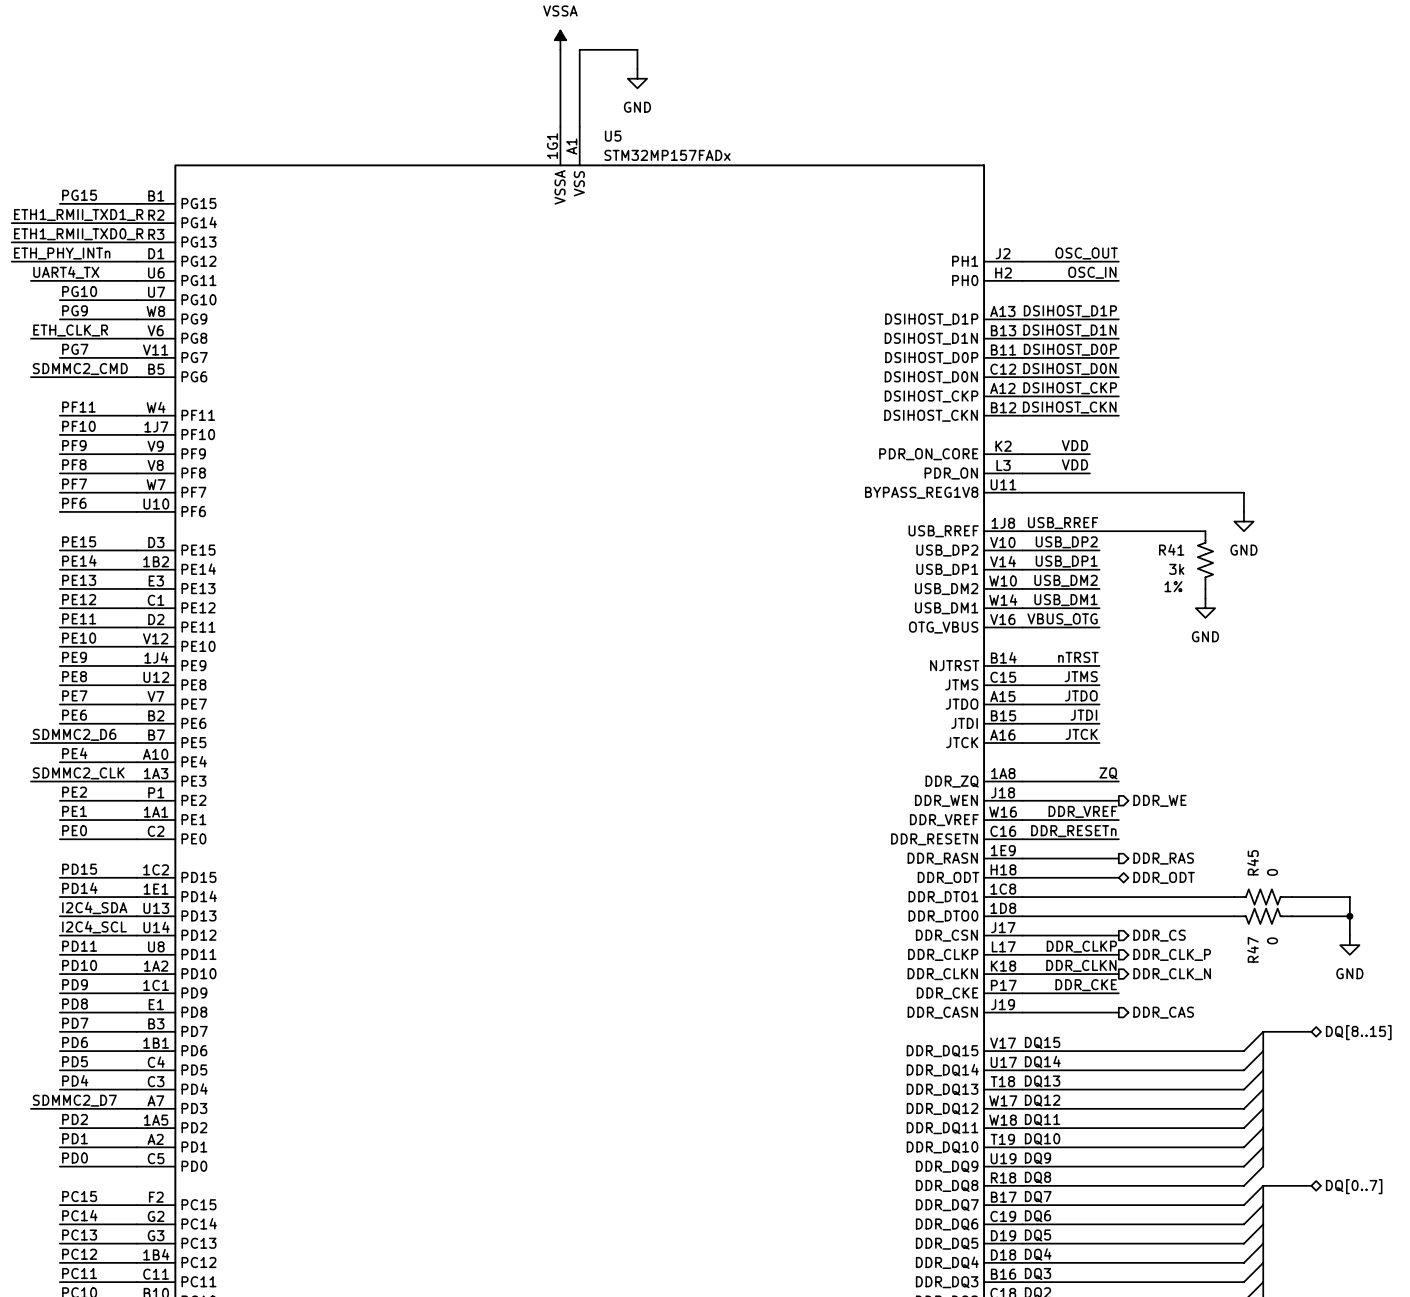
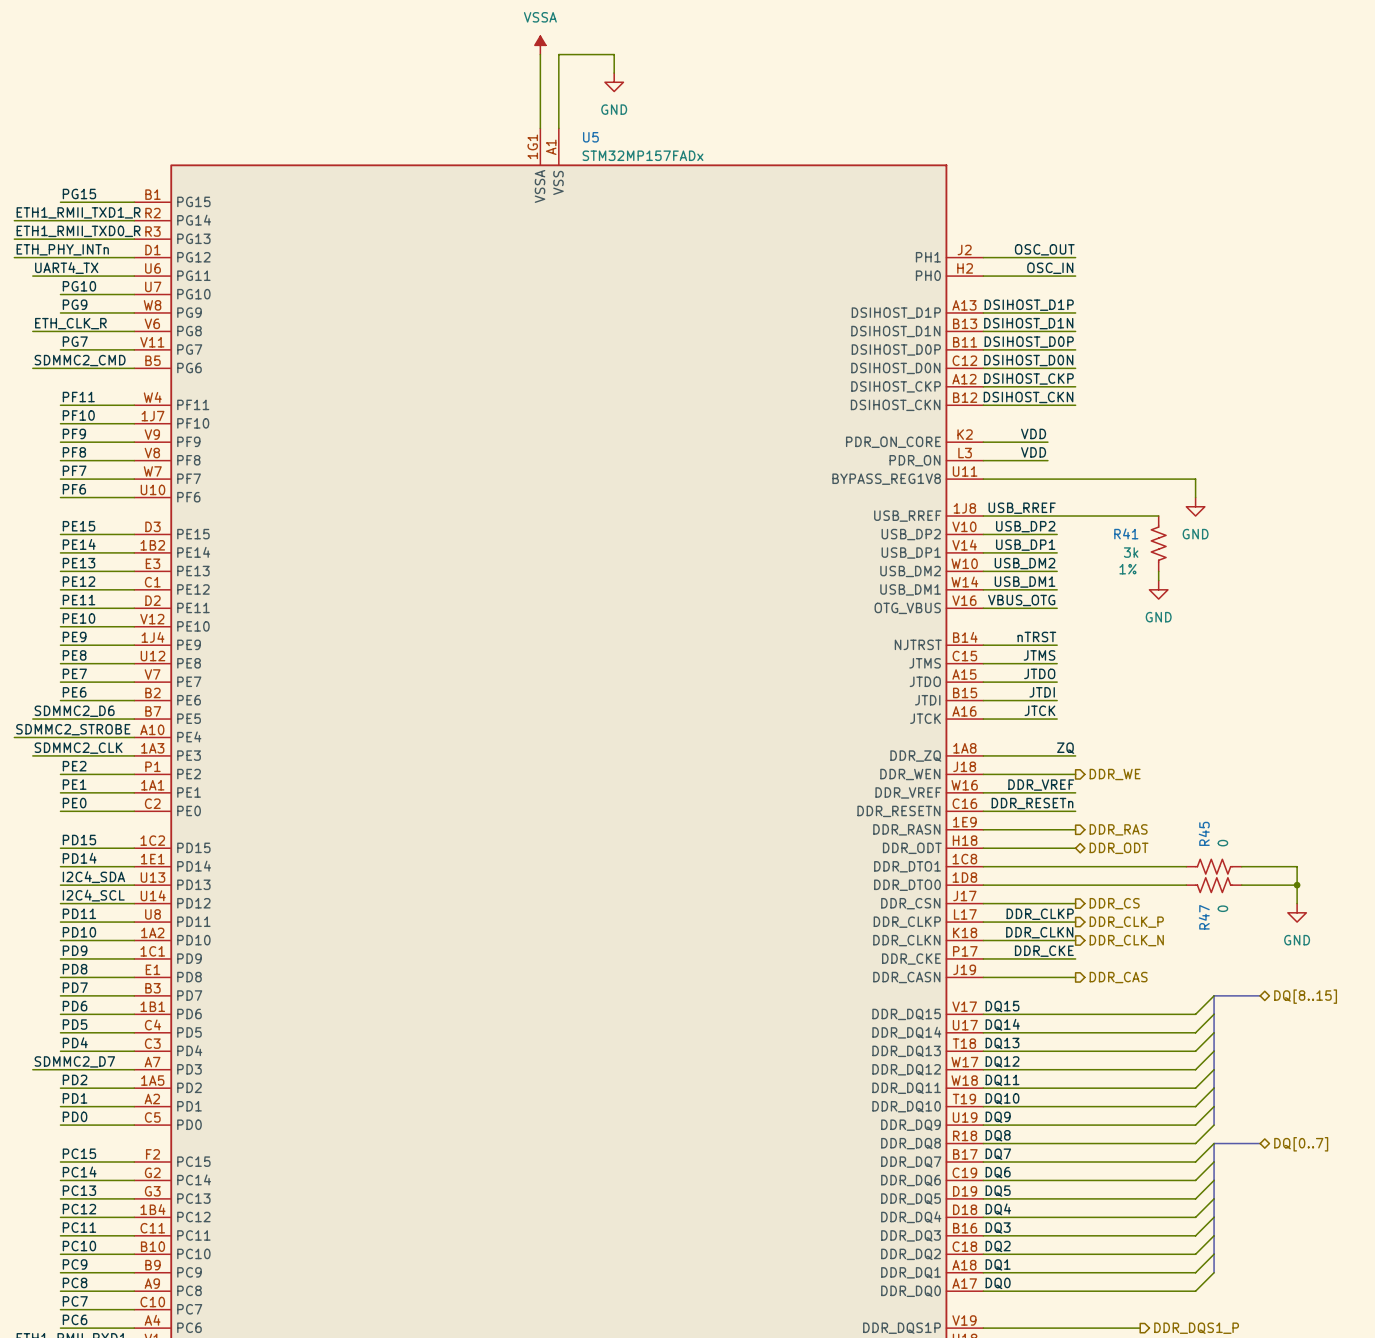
label: PE4 (74, 753) -> none
label: none -> SDMMC2_STROBE (73, 729)
wire: none -> (14, 737) (60, 737)

